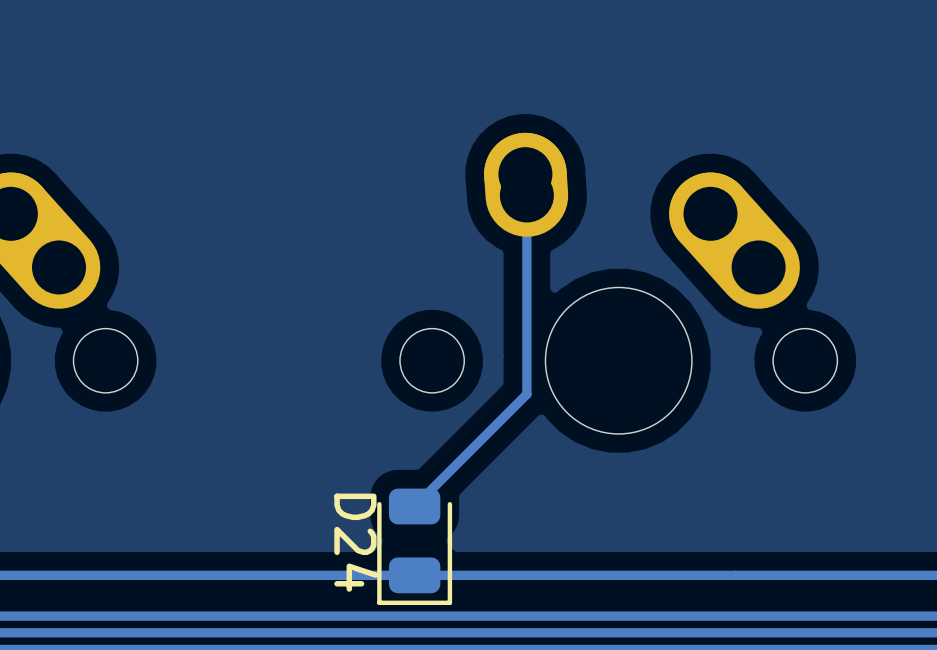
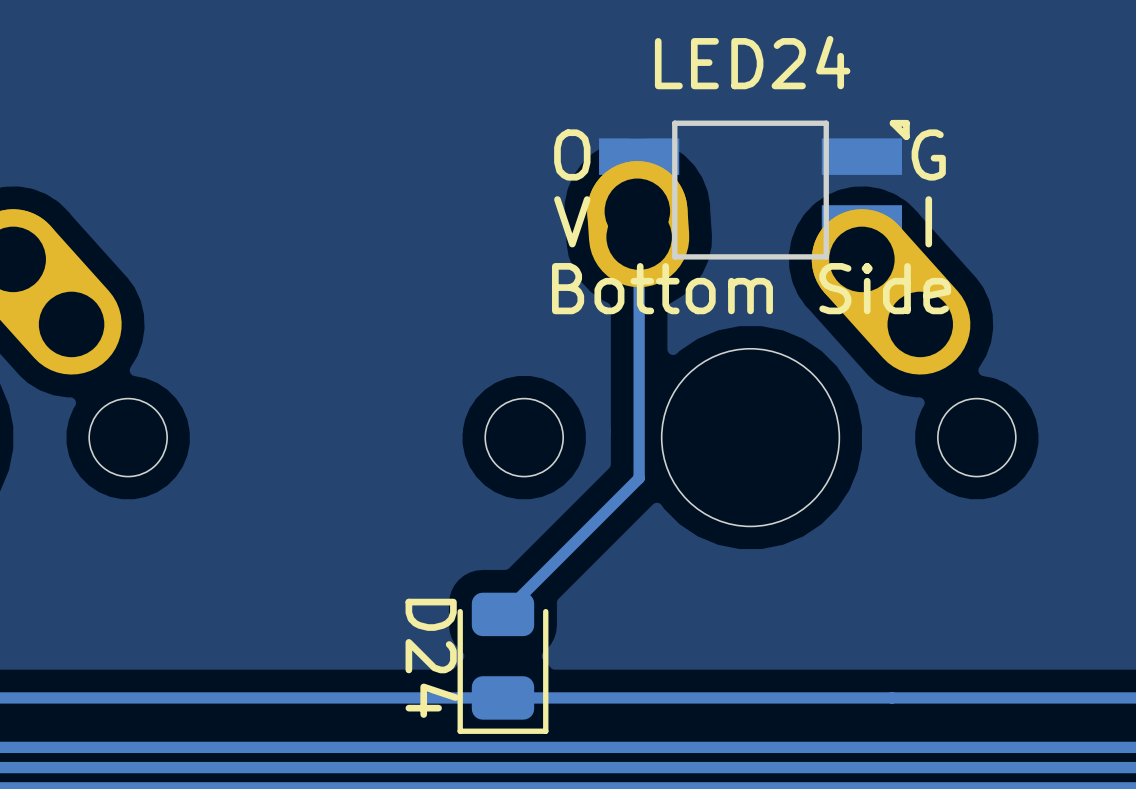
LED24: none -> (754, 189)

